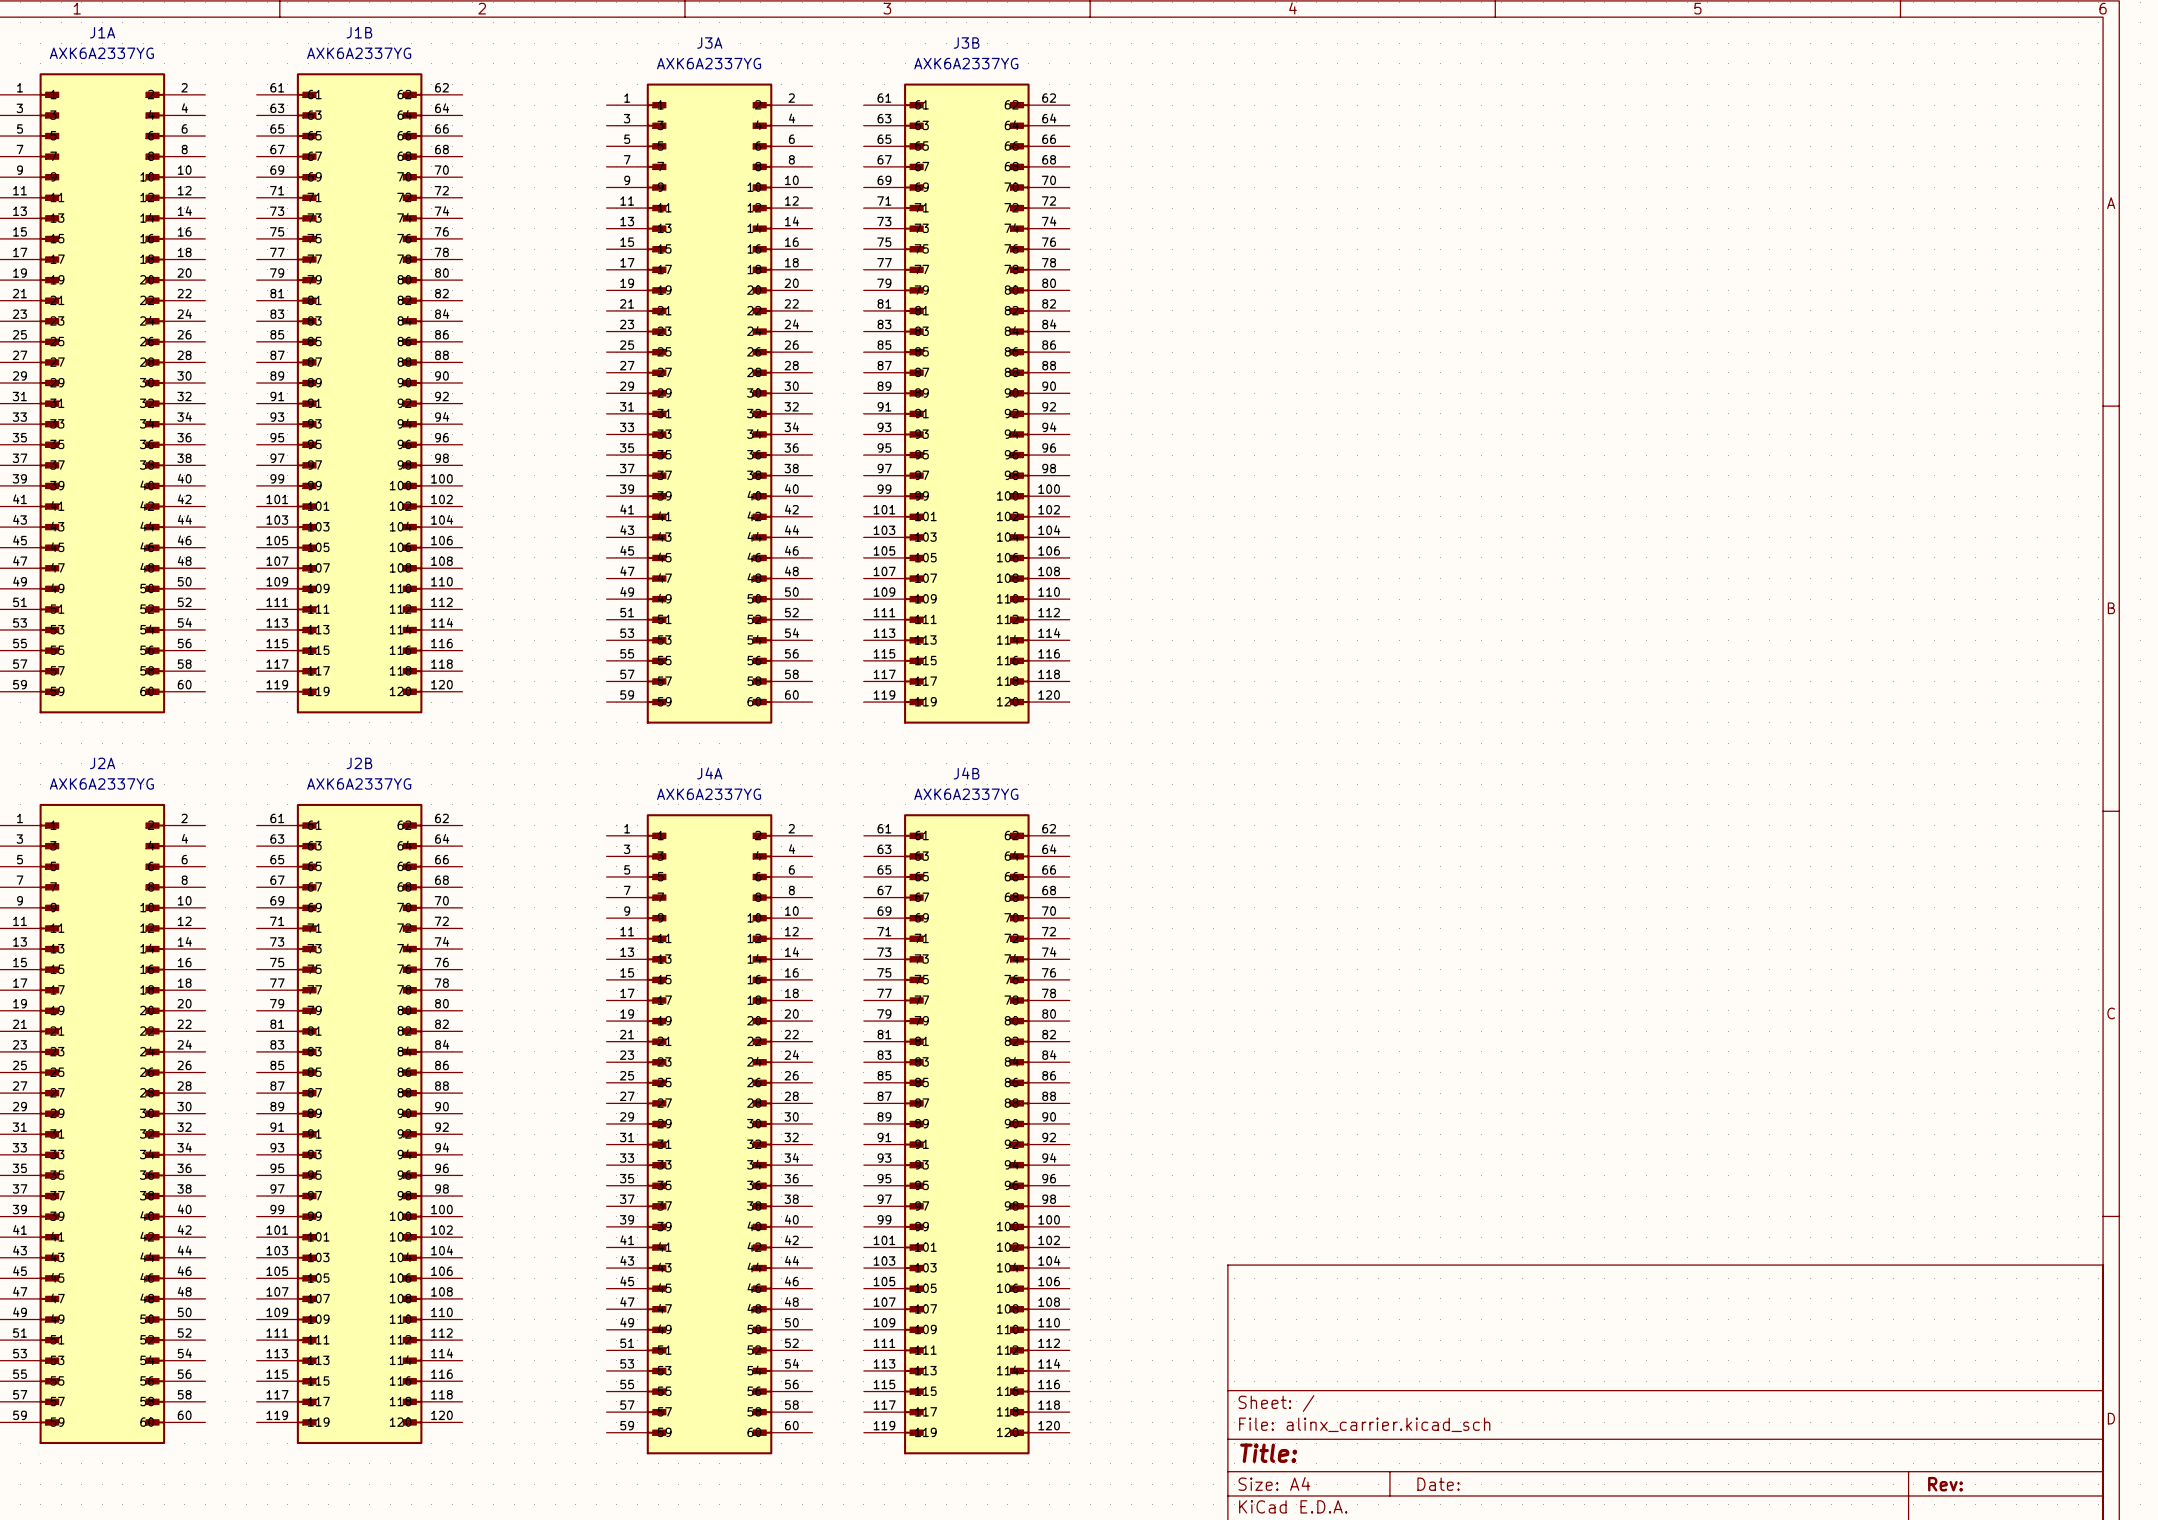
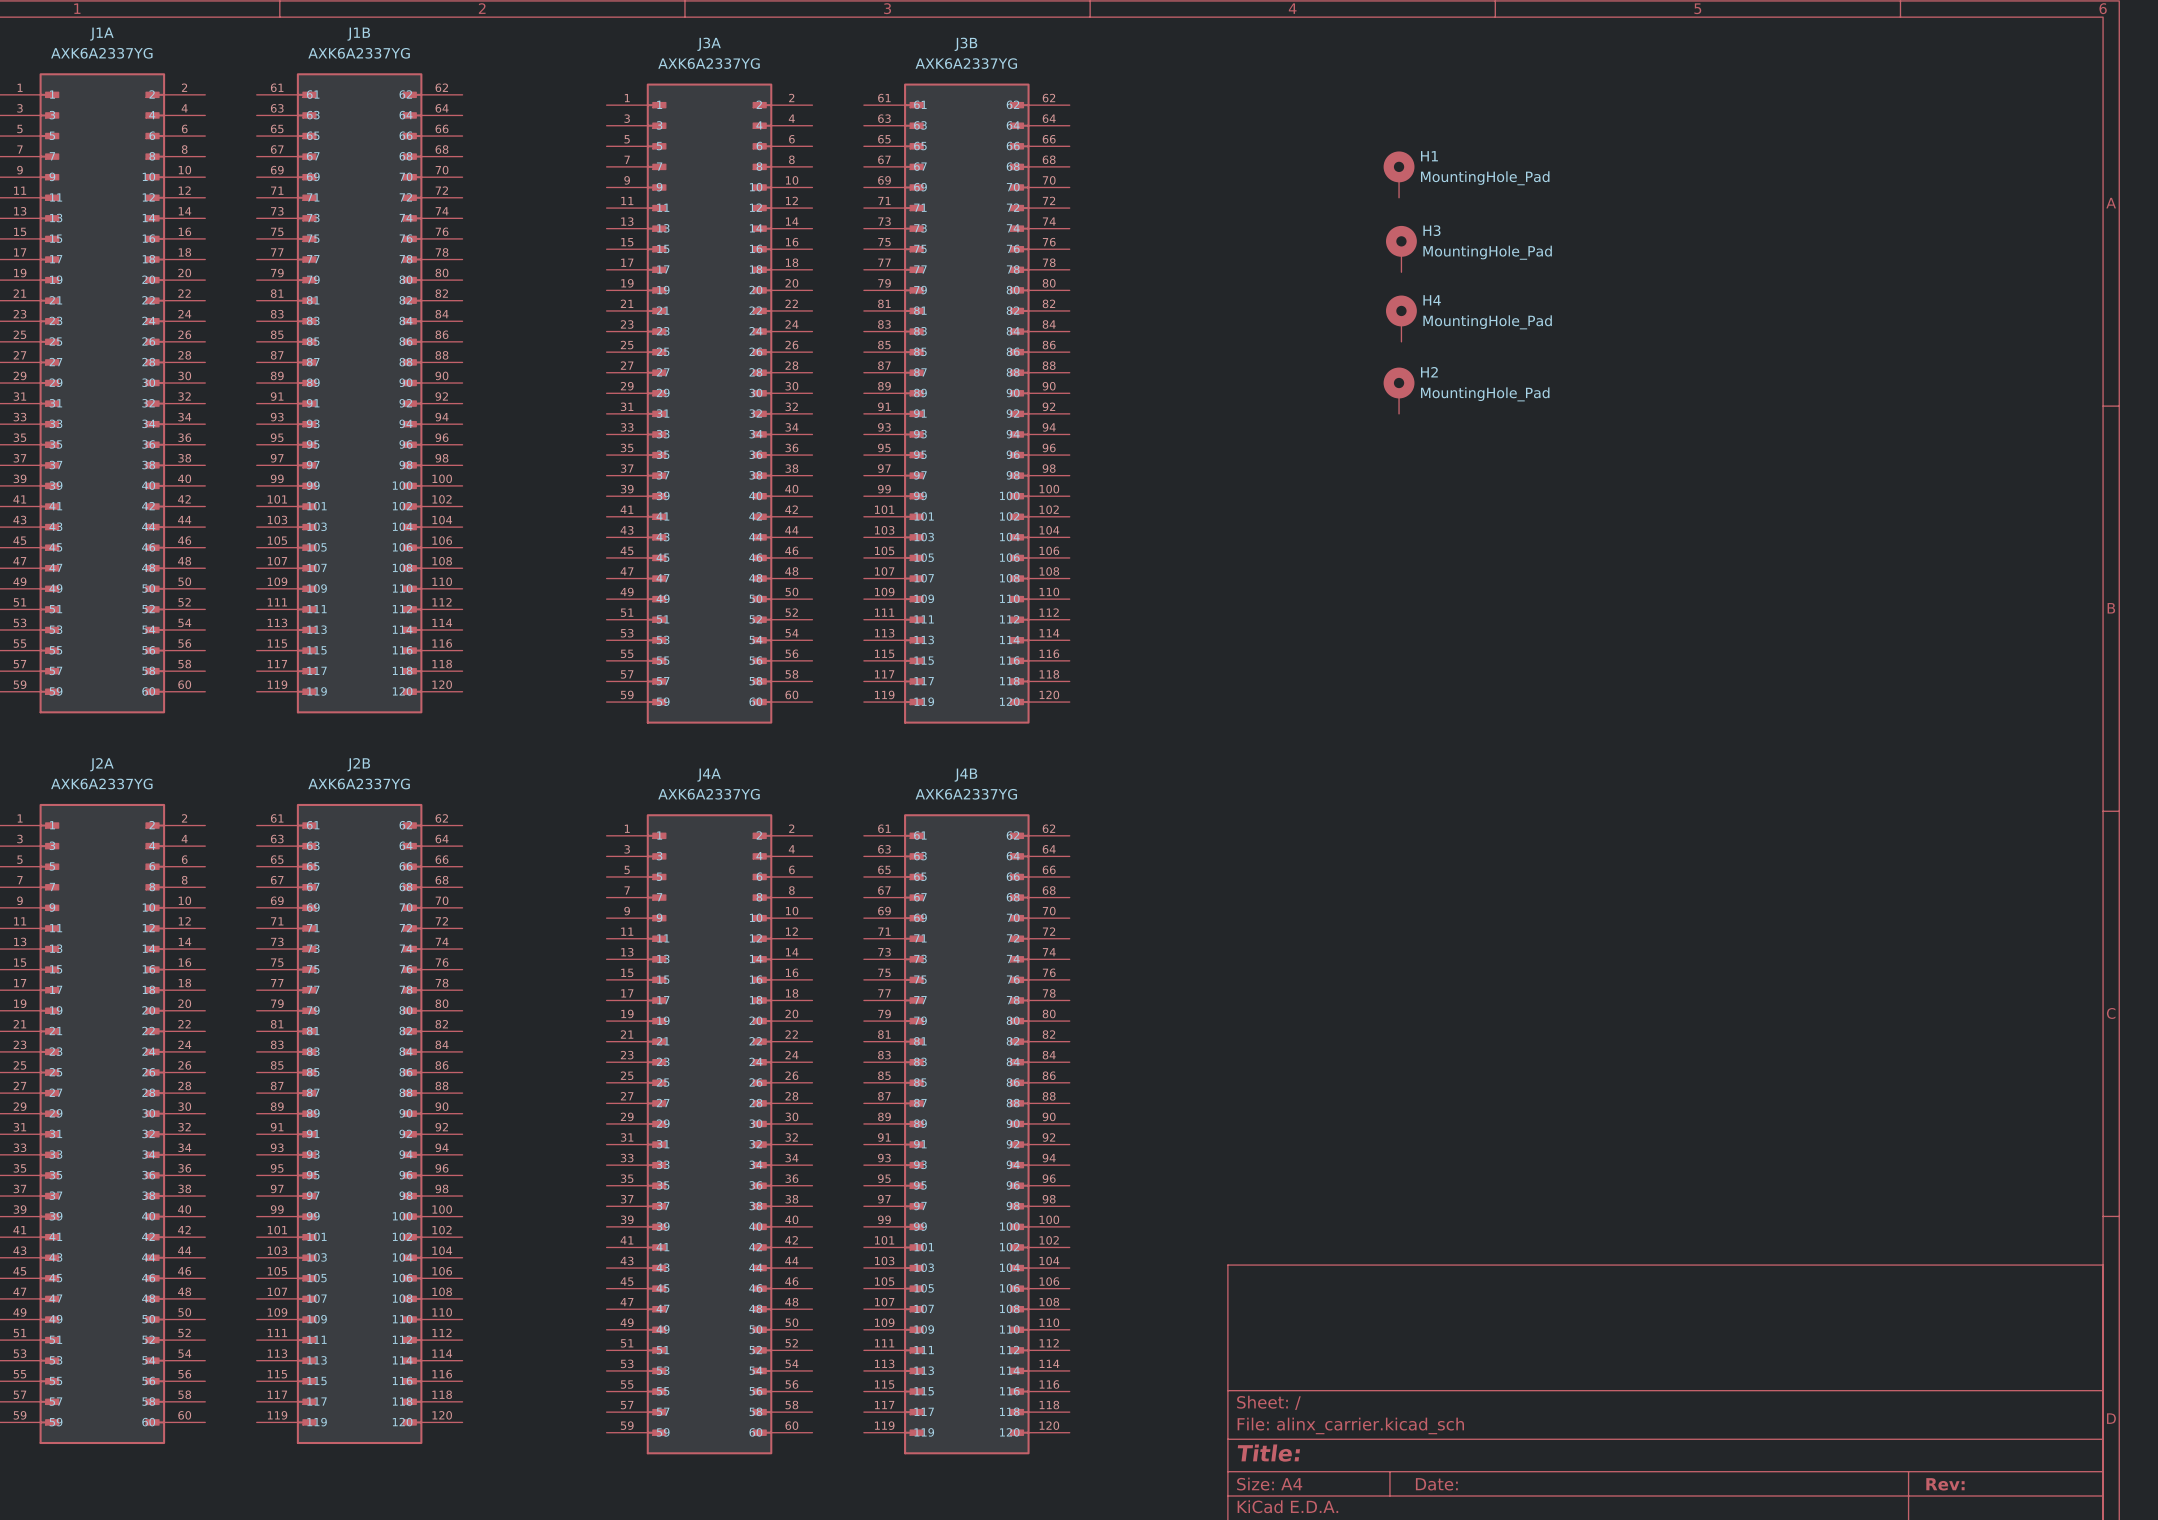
H1: none -> MountingHole_Pad (1399, 174)
H3: none -> MountingHole_Pad (1401, 249)
H4: none -> MountingHole_Pad (1401, 318)
H2: none -> MountingHole_Pad (1399, 390)

